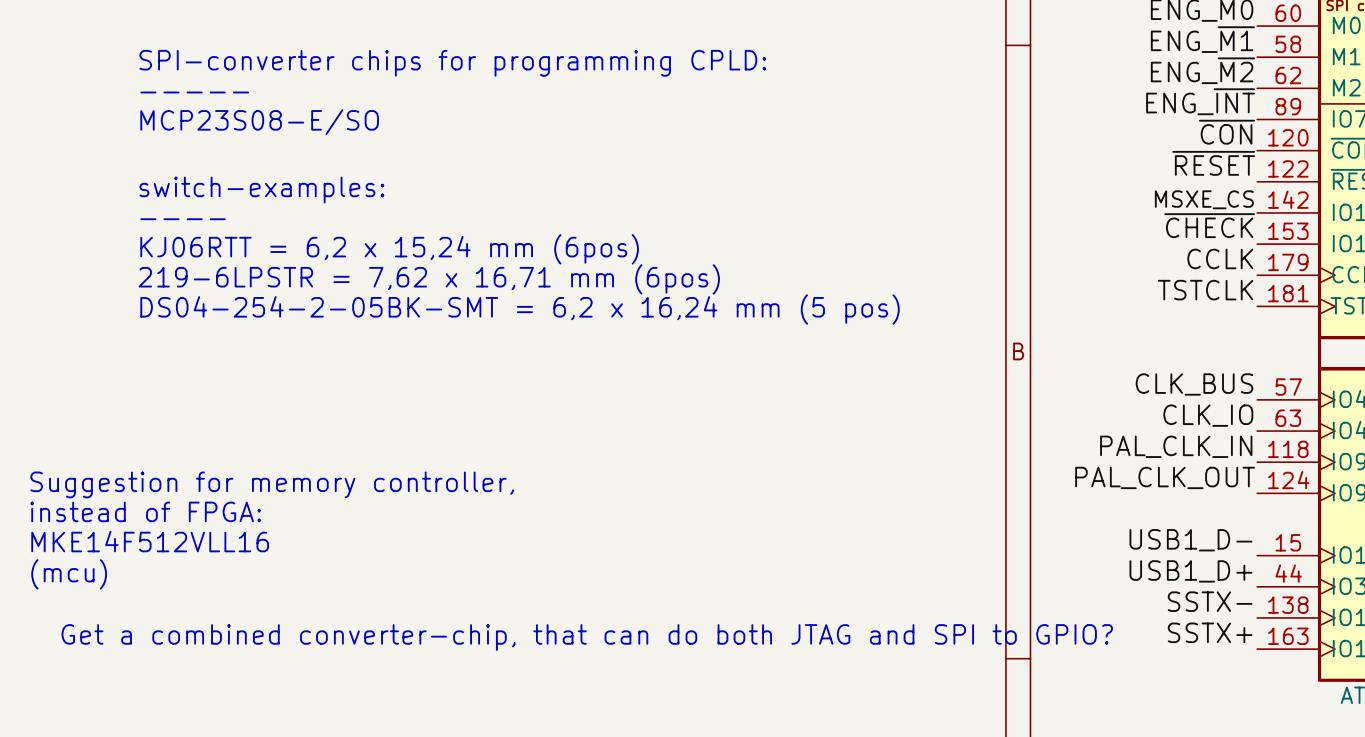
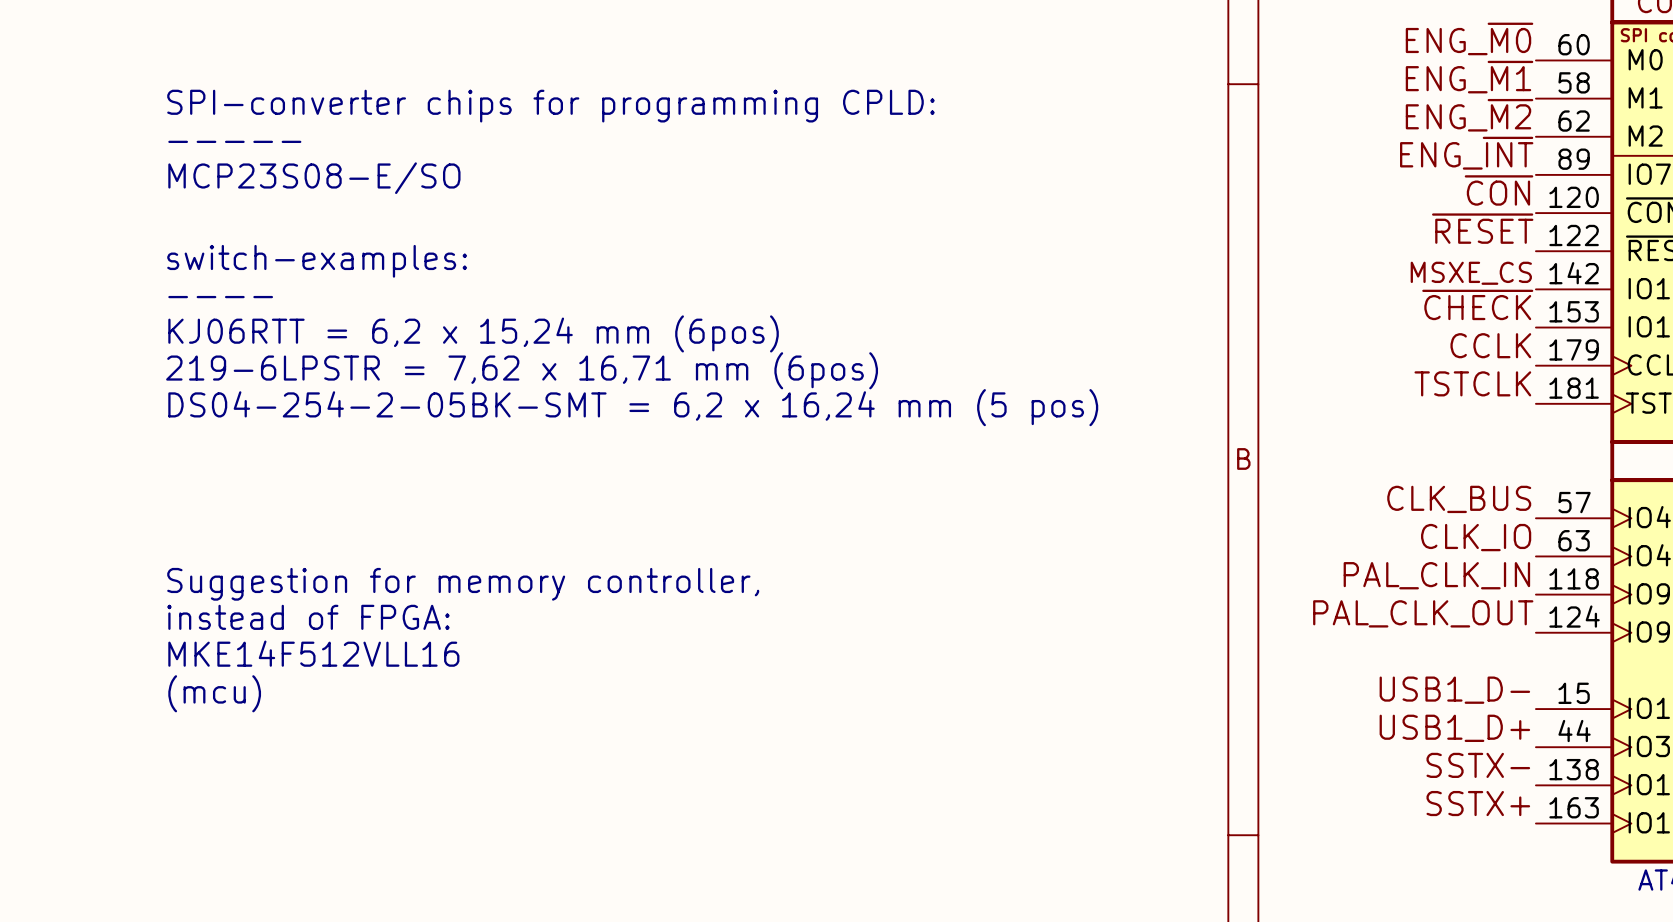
text position: Suggestion for memory controller, (272, 484) -> Suggestion for memory controller, (463, 584)
text position: instead of FPGA: (145, 511) -> instead of FPGA: (308, 617)
text position: MKE14F512VLL16 (150, 541) -> MKE14F512VLL16 (313, 653)
text position: (mcu) (69, 574) -> (mcu) (214, 693)
text: Get a combined converter-chip, that can do both JTAG and SPI to GPIO? (587, 637) -> none

